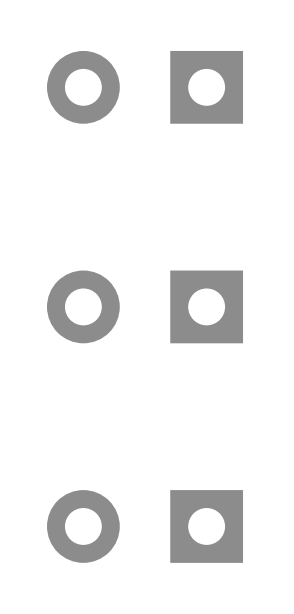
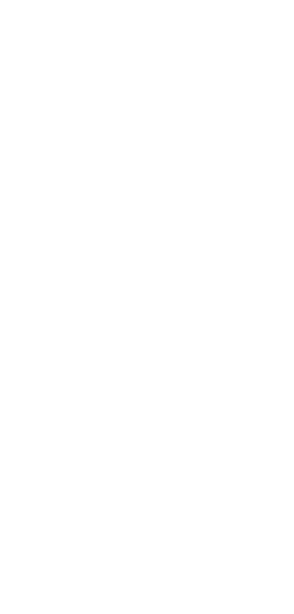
part: (145, 87) -> none
part: (145, 306) -> none
part: (145, 526) -> none

